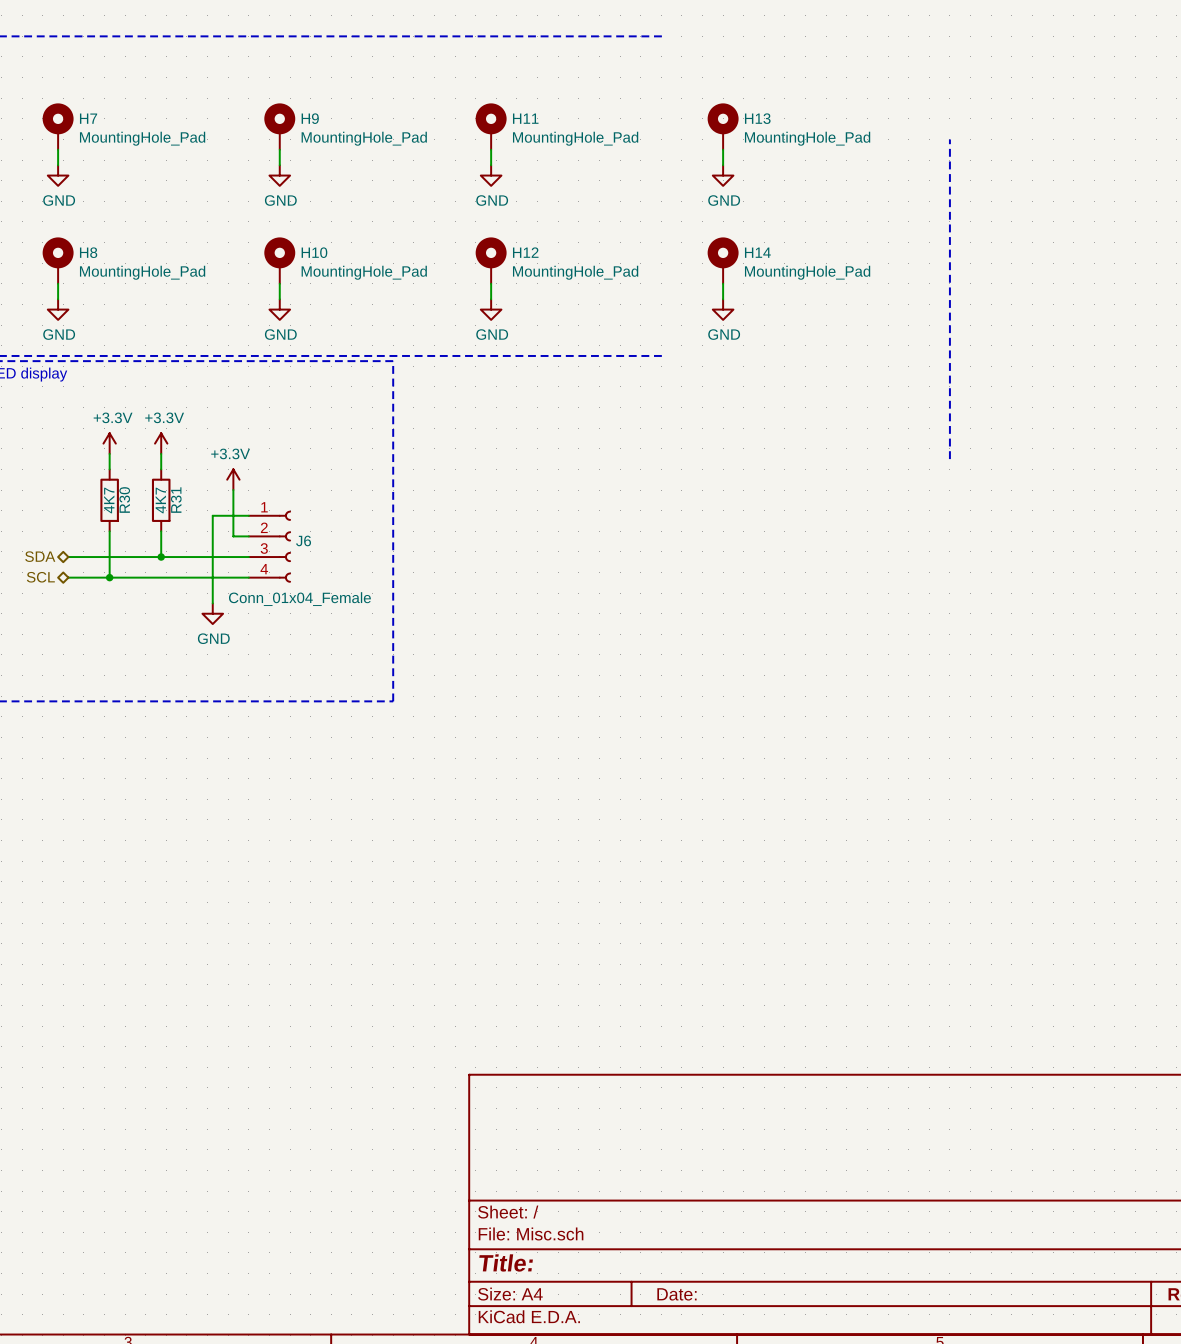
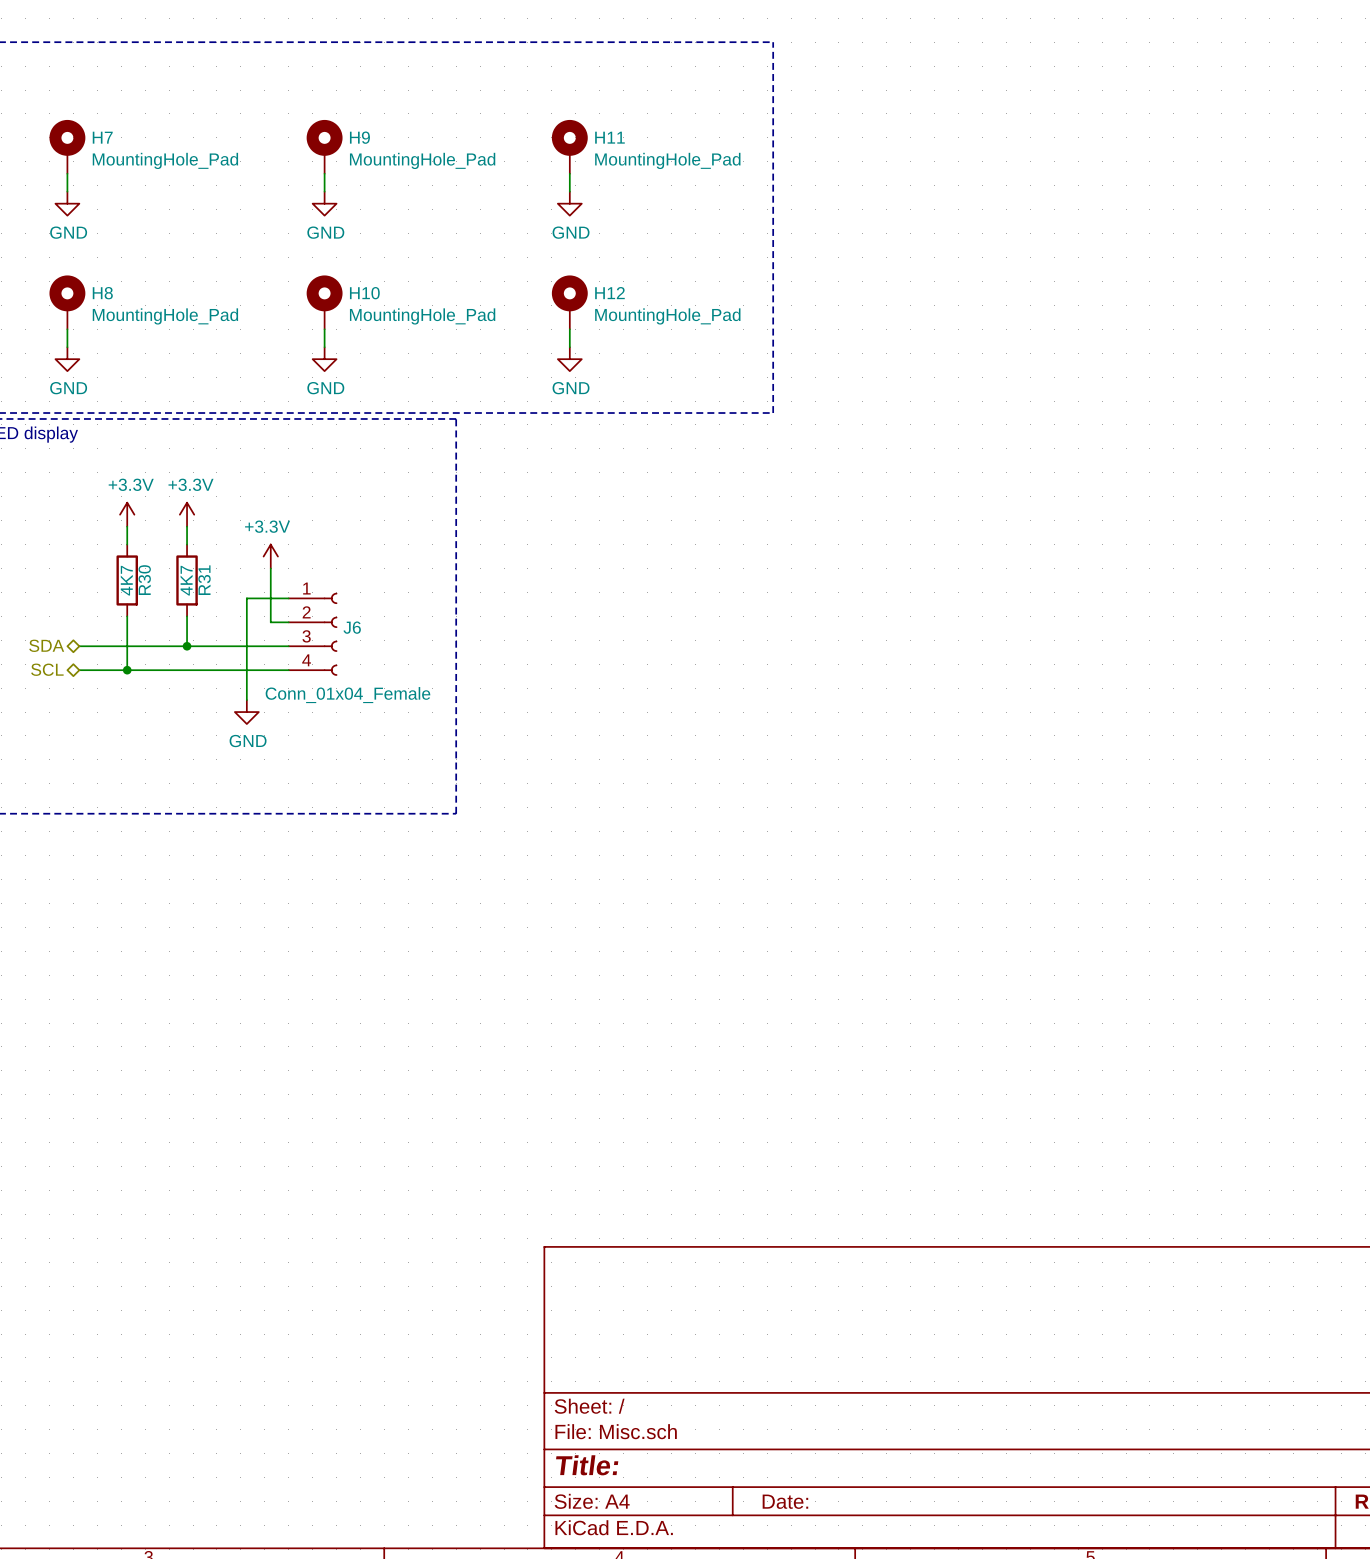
line: none -> (773, 42) (773, 413)
H13: MountingHole_Pad (723, 126) -> none
line: (949, 139) (949, 459) -> none
wire: (723, 149) (723, 165) -> none
power symbol: GND (723, 175) -> none
H14: MountingHole_Pad (723, 260) -> none
wire: (723, 283) (723, 299) -> none
power symbol: GND (723, 309) -> none

